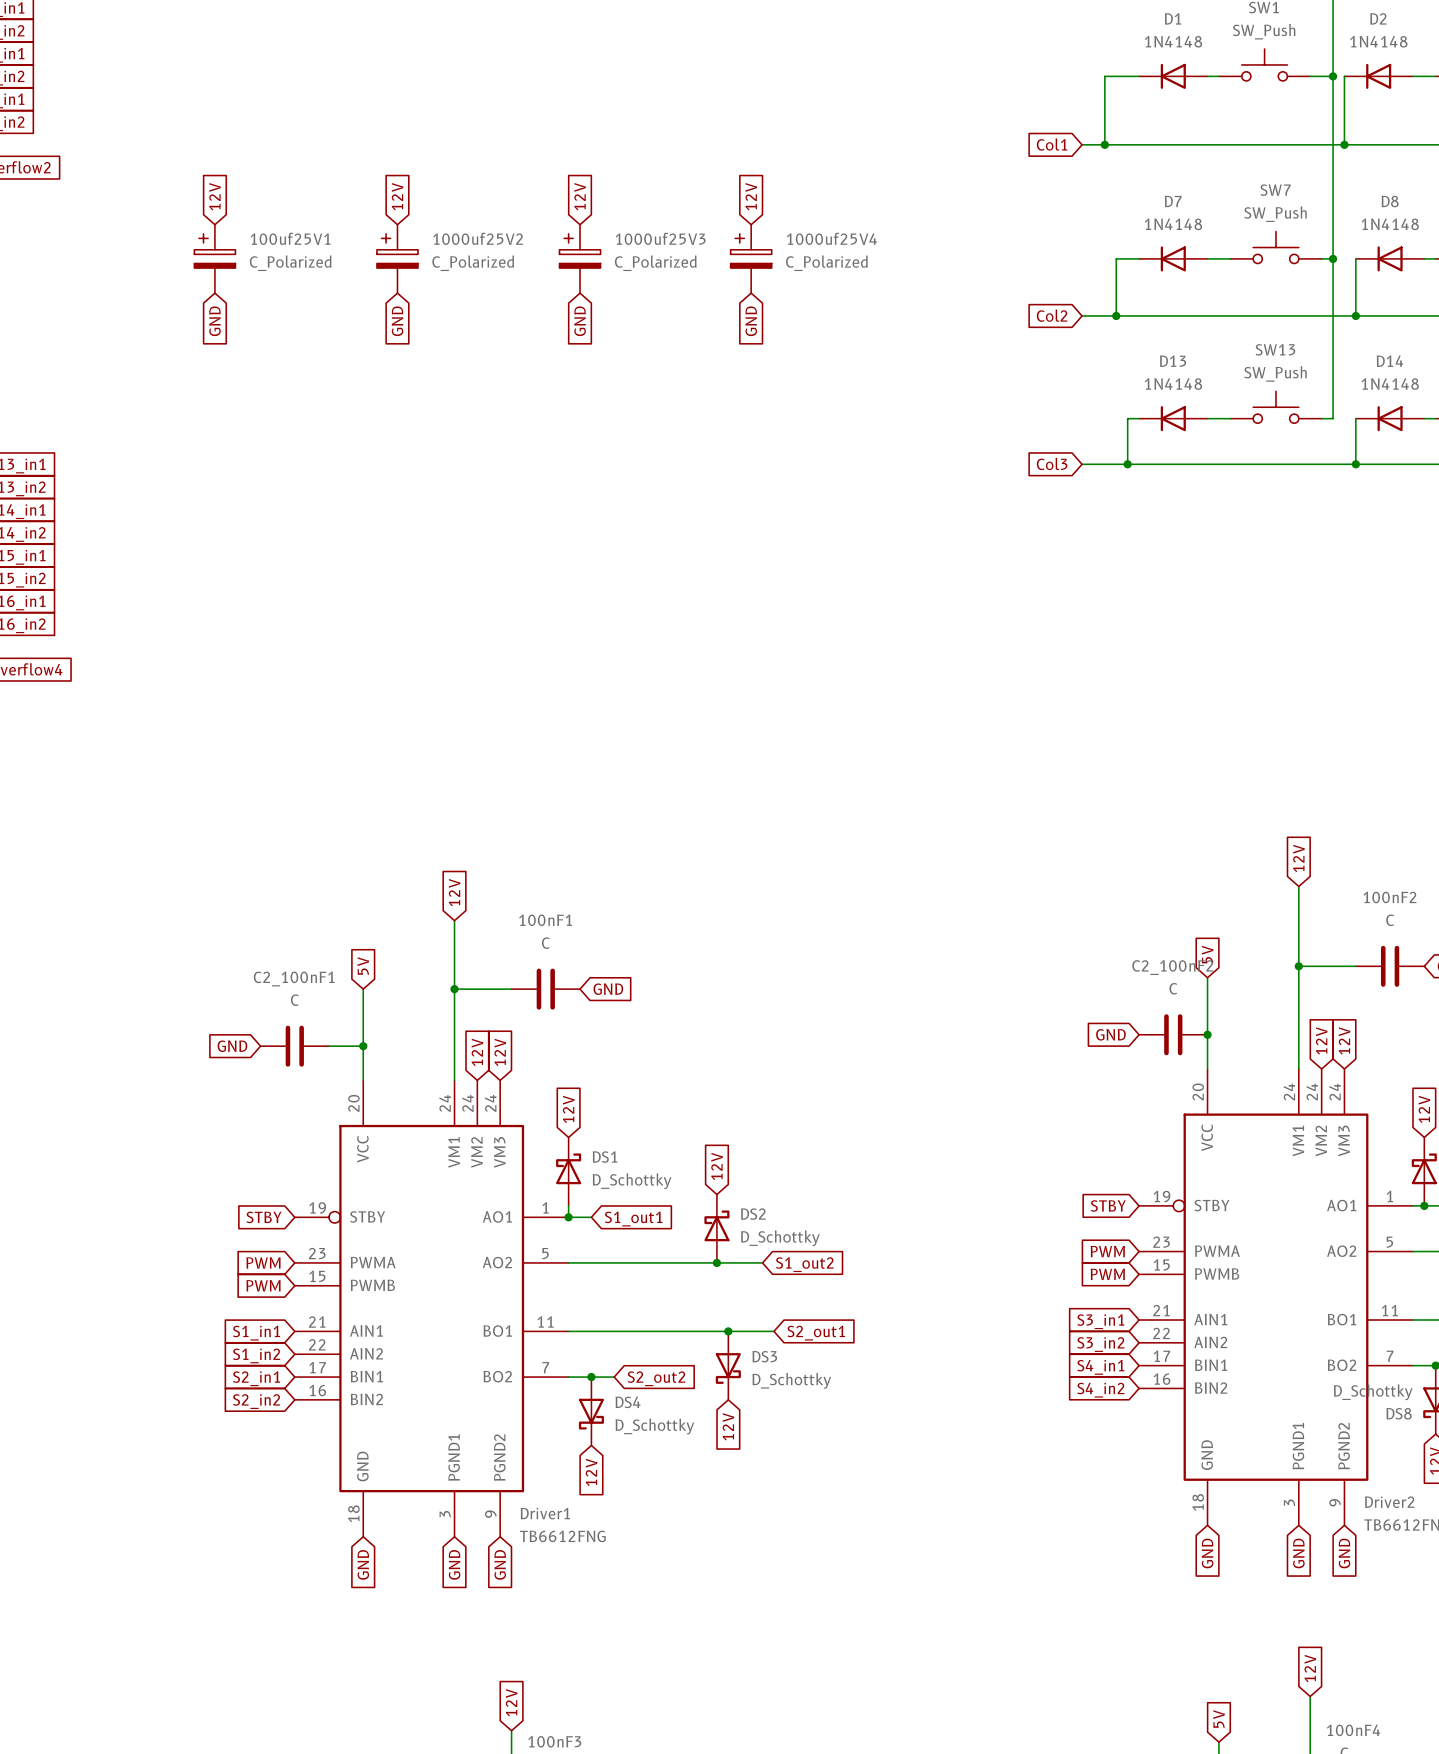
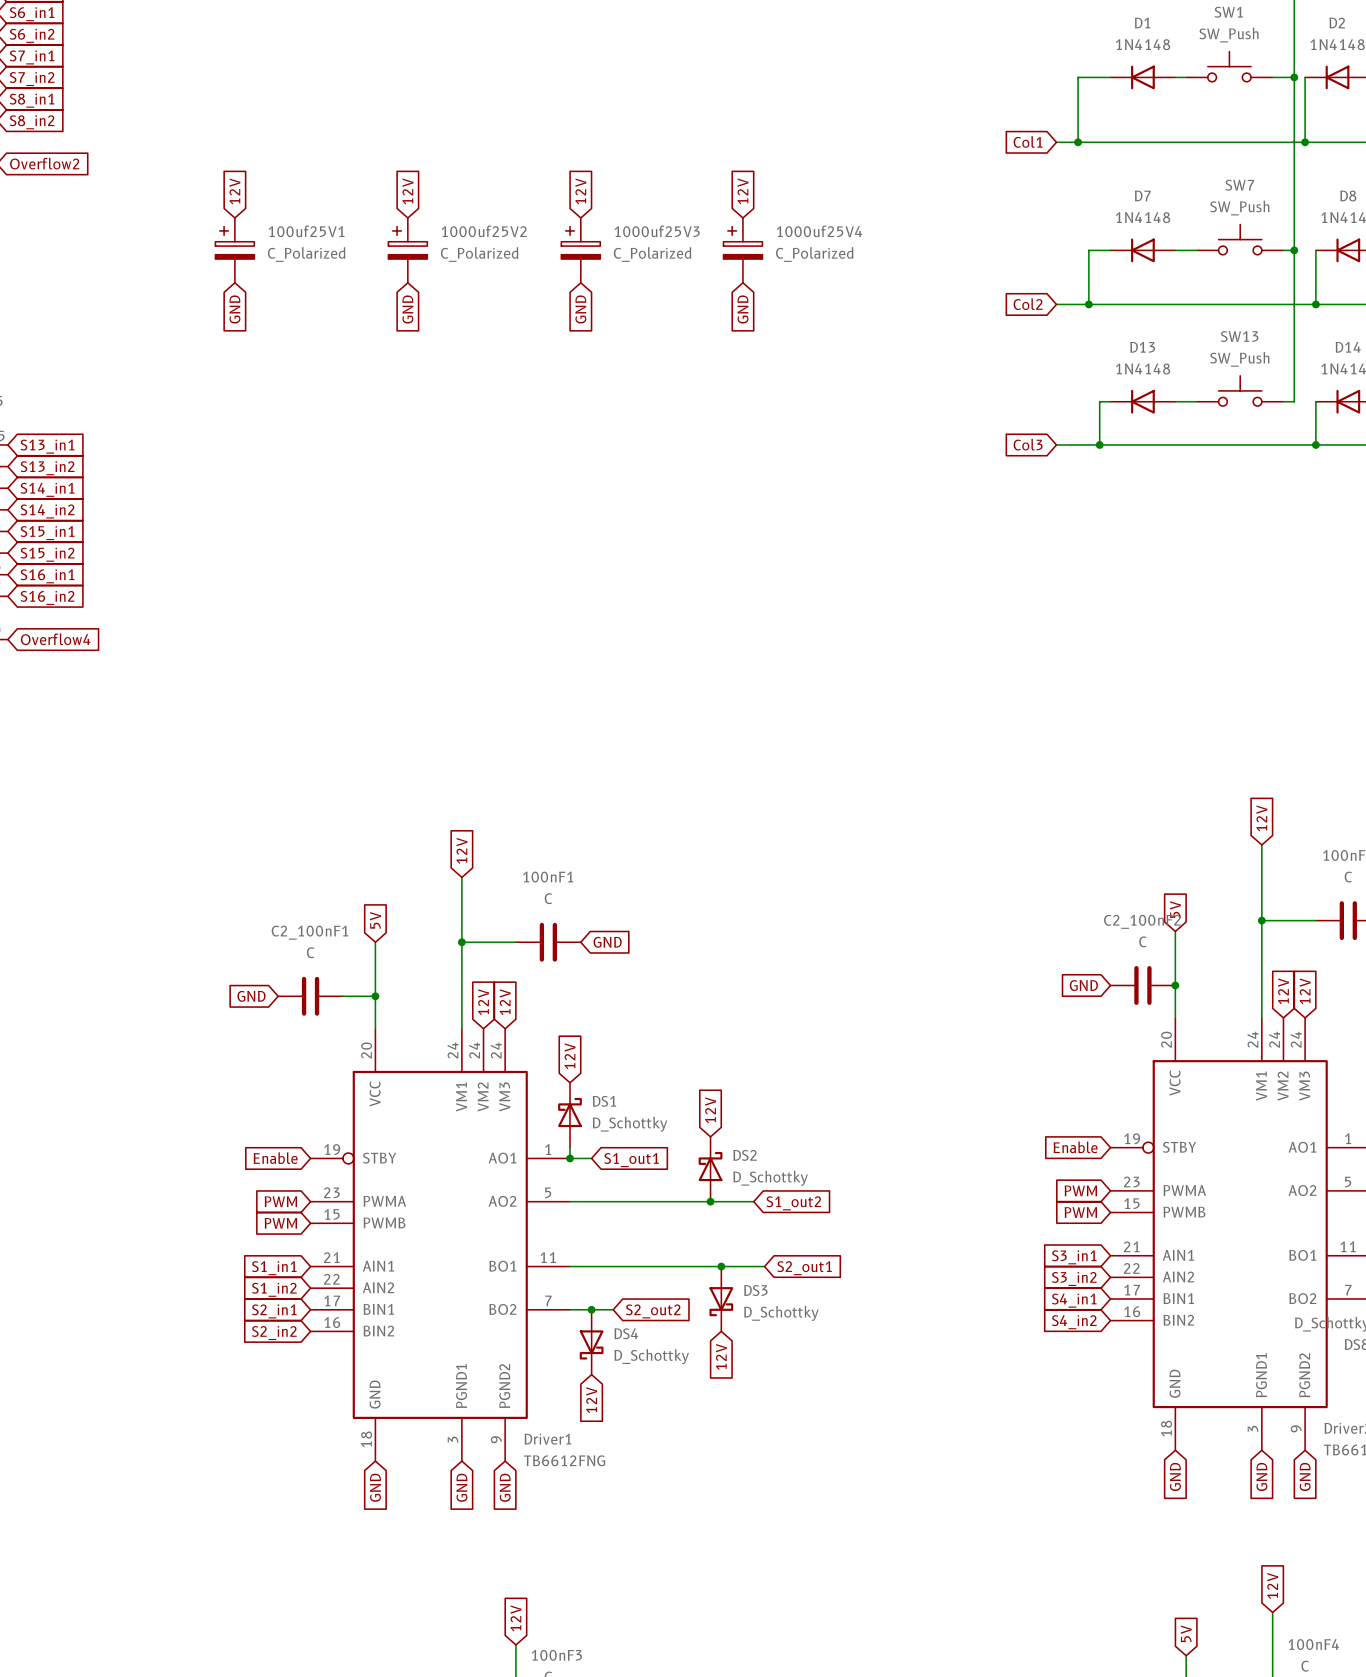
global label: STBY (1108, 1205) -> Enable (1075, 1147)
global label: STBY (264, 1217) -> Enable (275, 1158)

